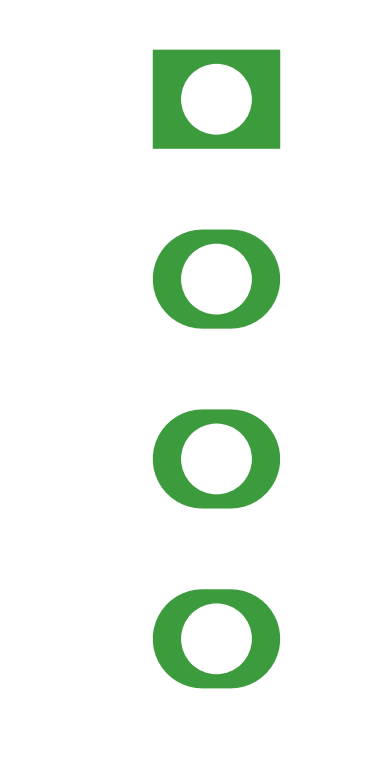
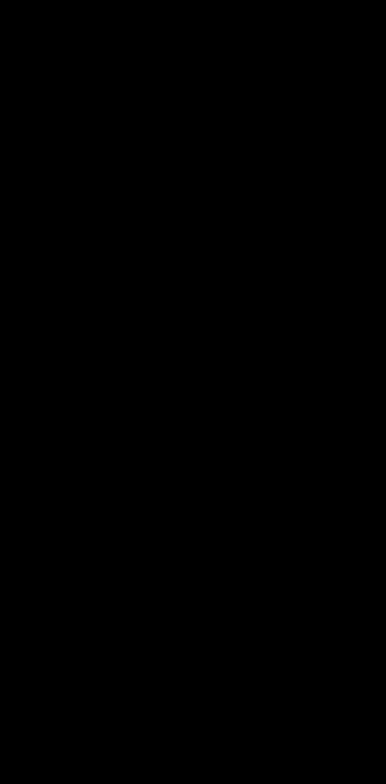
part: (216, 369) -> none

